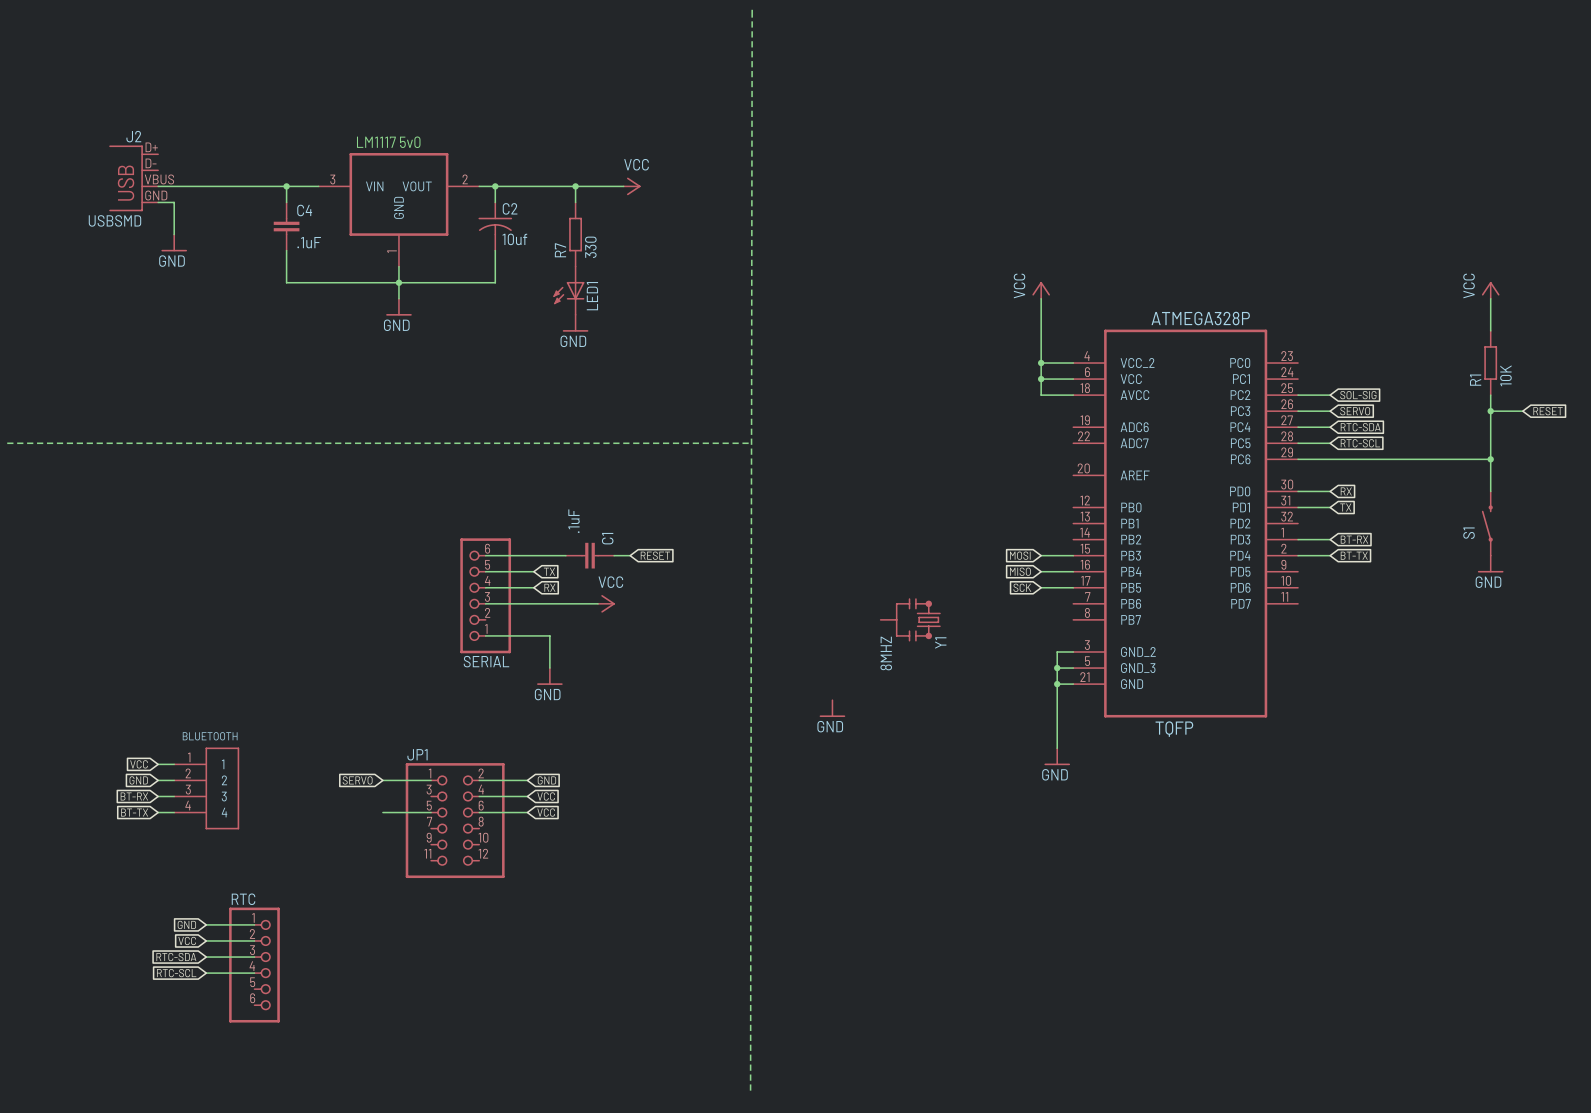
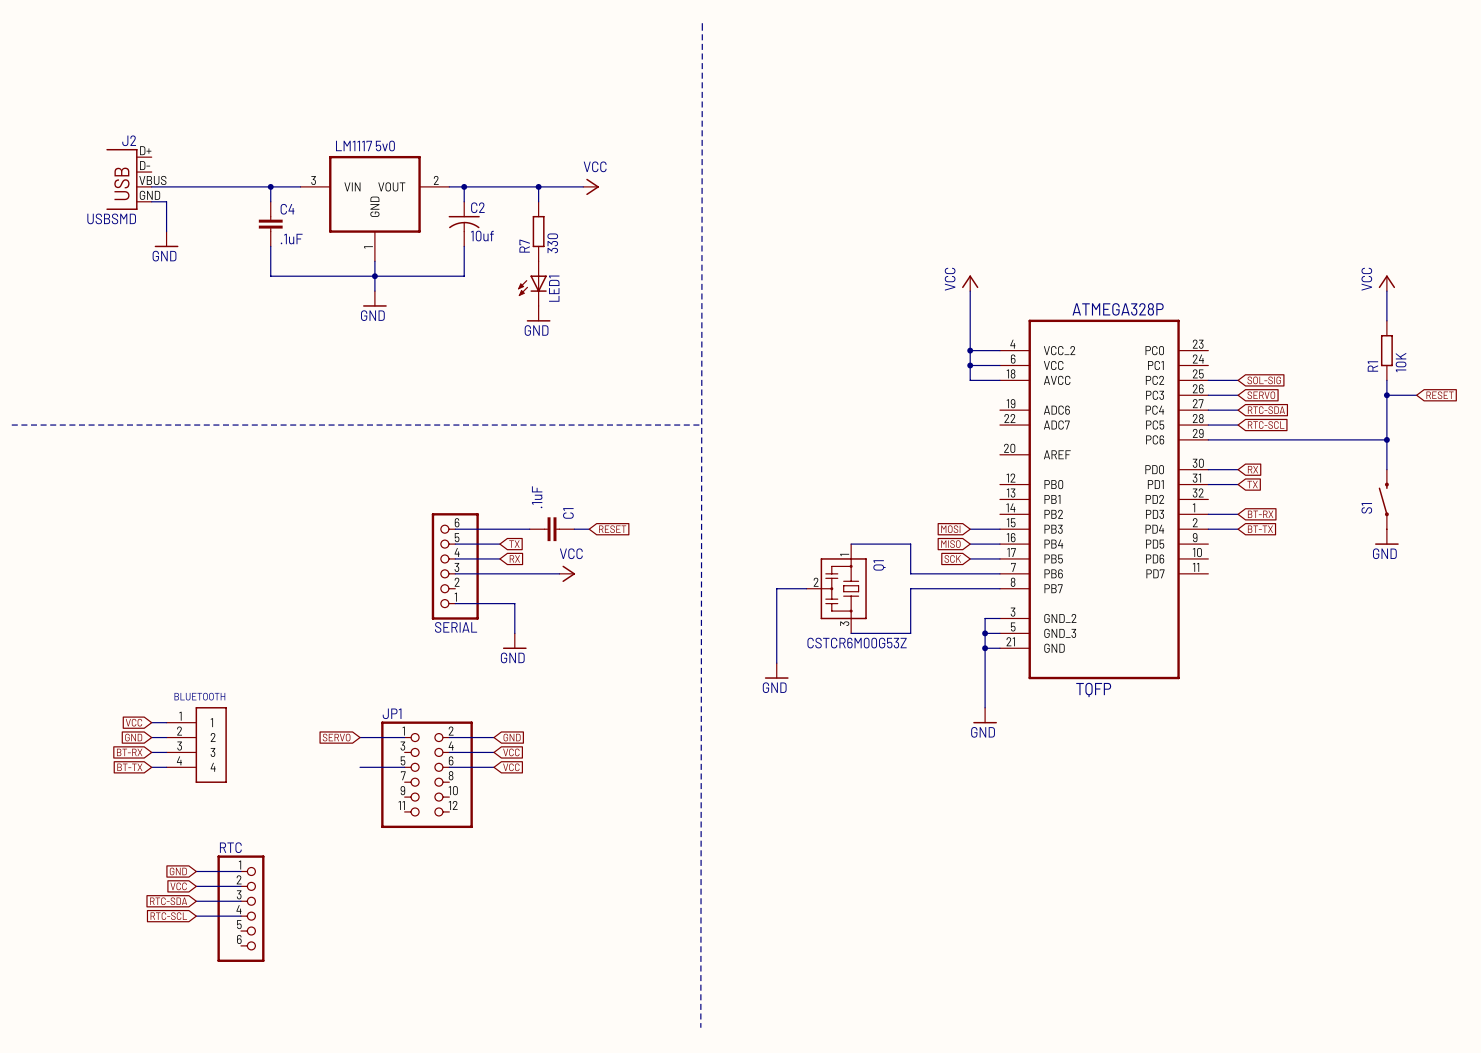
wire: none -> (851, 544) (910, 544) (910, 573) (999, 573)
wire: none -> (806, 588) (776, 588) (776, 663)
Q1: none -> CSTCR6M00G53Z (836, 588)
Y1: 8MHZ (910, 619) -> none
wire: none -> (999, 588) (910, 588) (910, 633) (851, 633)

